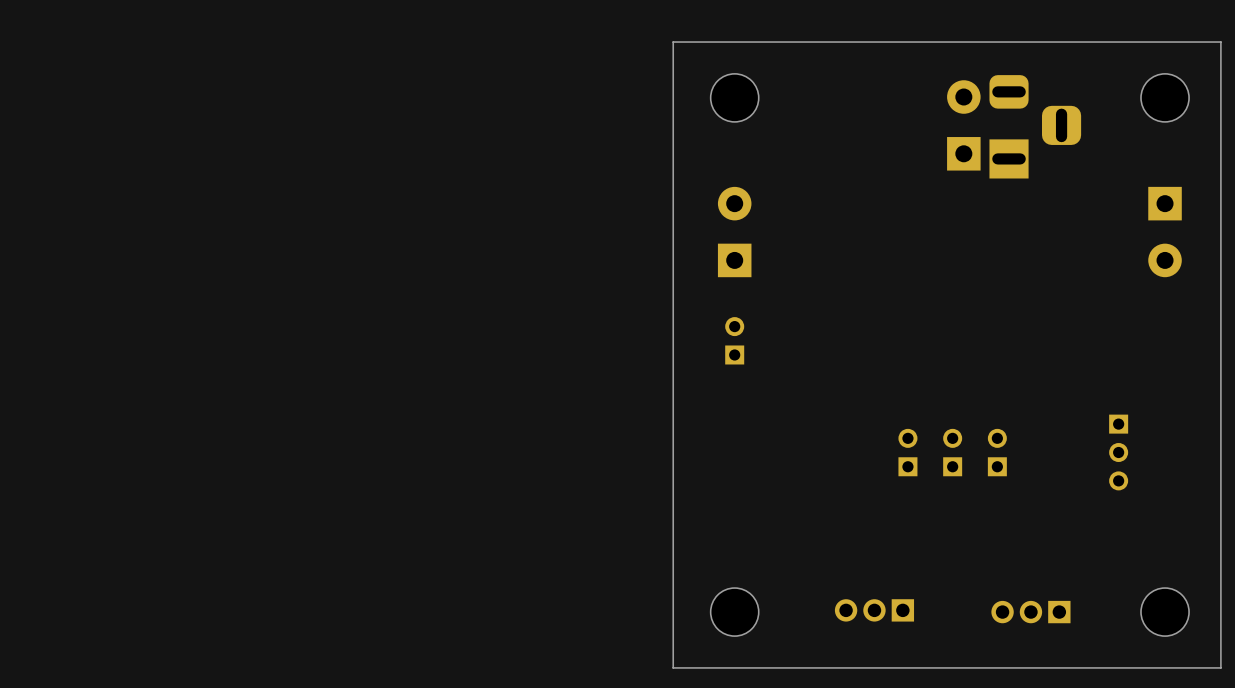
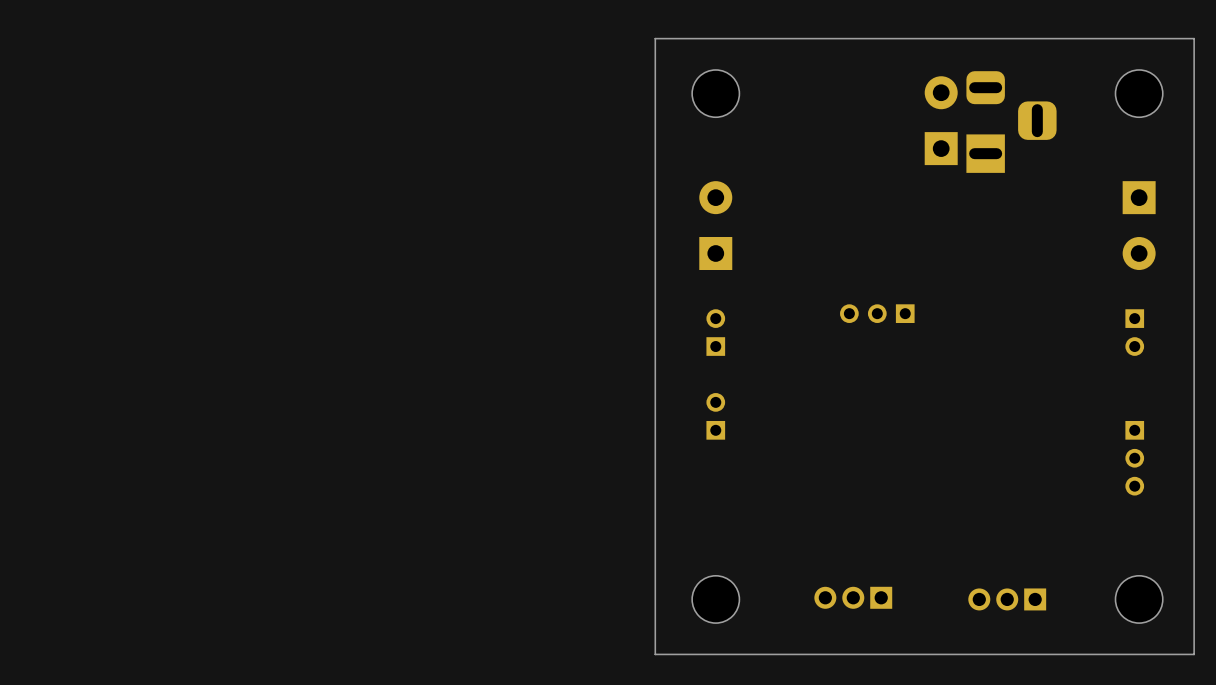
part: none -> (877, 313)
part: none -> (1134, 332)
part: none -> (715, 416)
part: (907, 452) -> none
part: (952, 452) -> none
part: (997, 452) -> none
part position: (1118, 452) -> (1134, 458)

